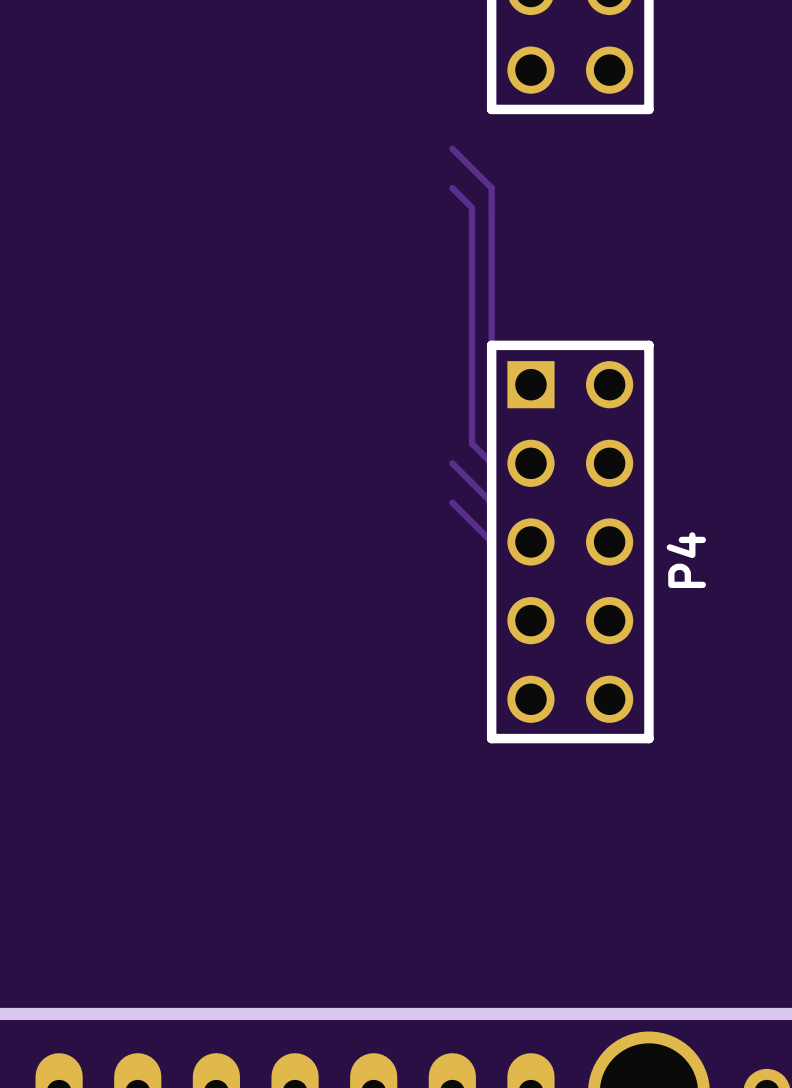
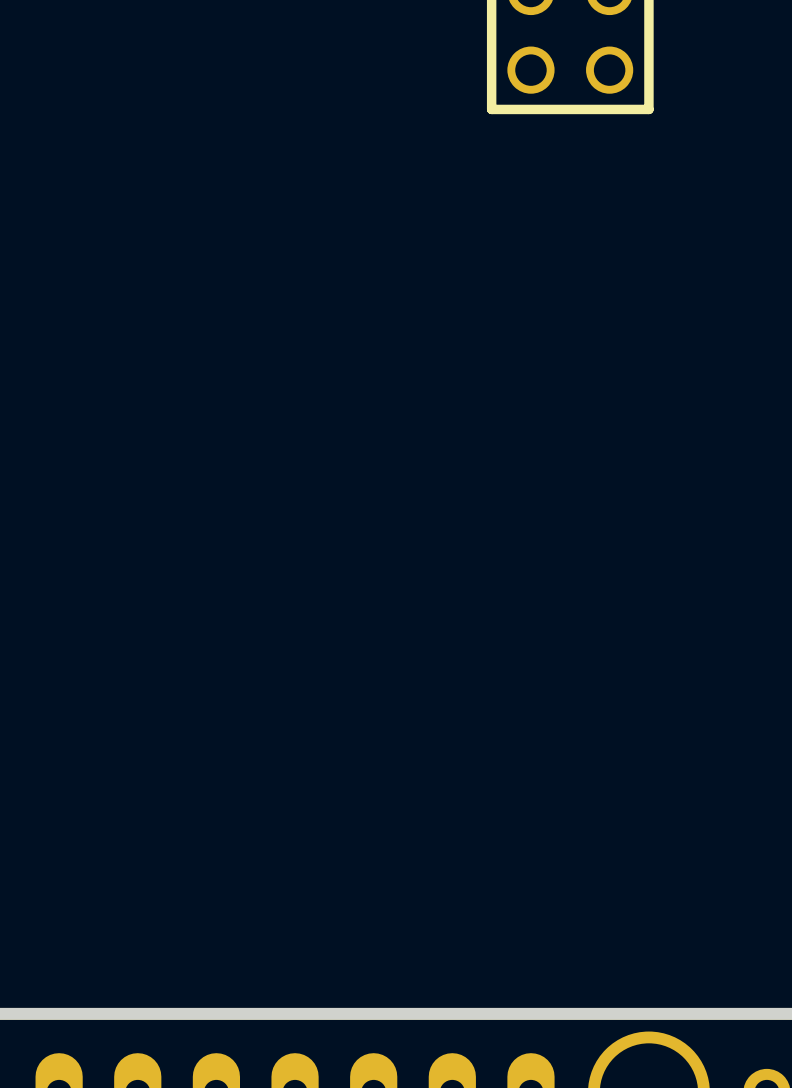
track: (452, 148) (491, 188) (491, 424) -> none
track: (452, 188) (471, 207) (471, 443) (491, 463) -> none
track: (452, 463) (491, 502) -> none
track: (452, 502) (491, 541) -> none
P4: (570, 541) -> none

